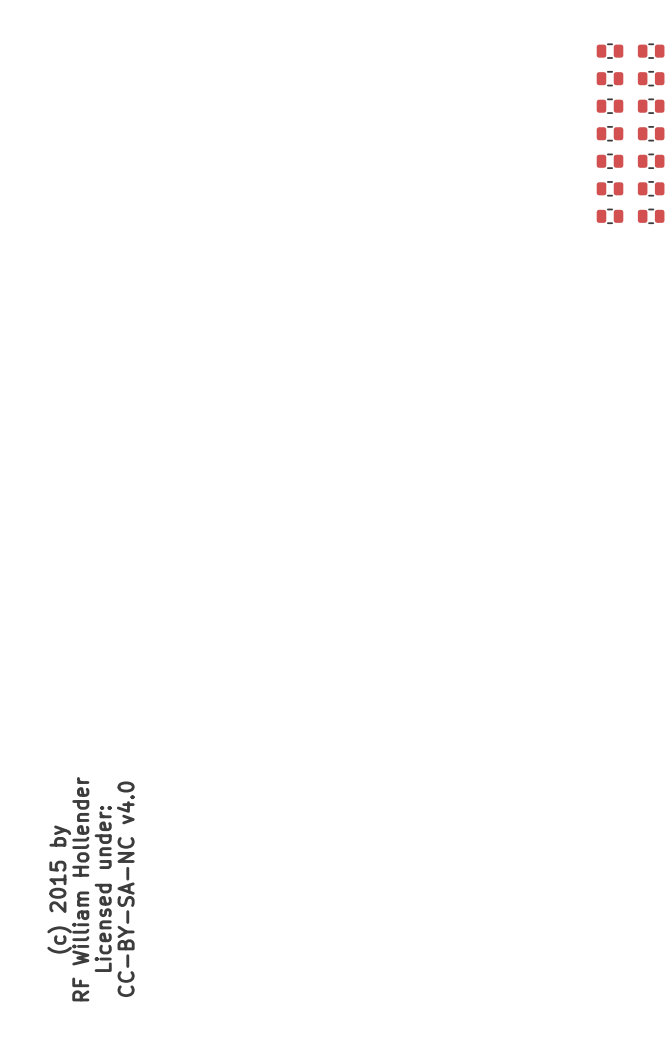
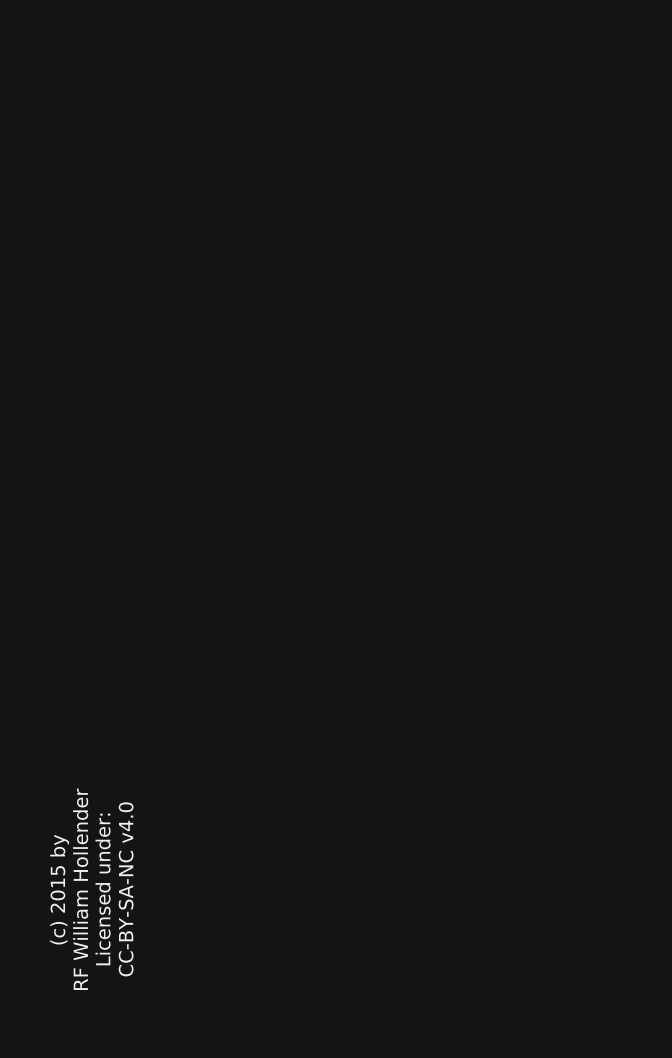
part: (610, 51) -> none
part: (651, 51) -> none
part: (610, 78) -> none
part: (651, 78) -> none
part: (610, 106) -> none
part: (651, 106) -> none
part: (610, 133) -> none
part: (651, 133) -> none
part: (610, 161) -> none
part: (651, 161) -> none
part: (610, 188) -> none
part: (651, 188) -> none
part: (610, 216) -> none
part: (651, 216) -> none

